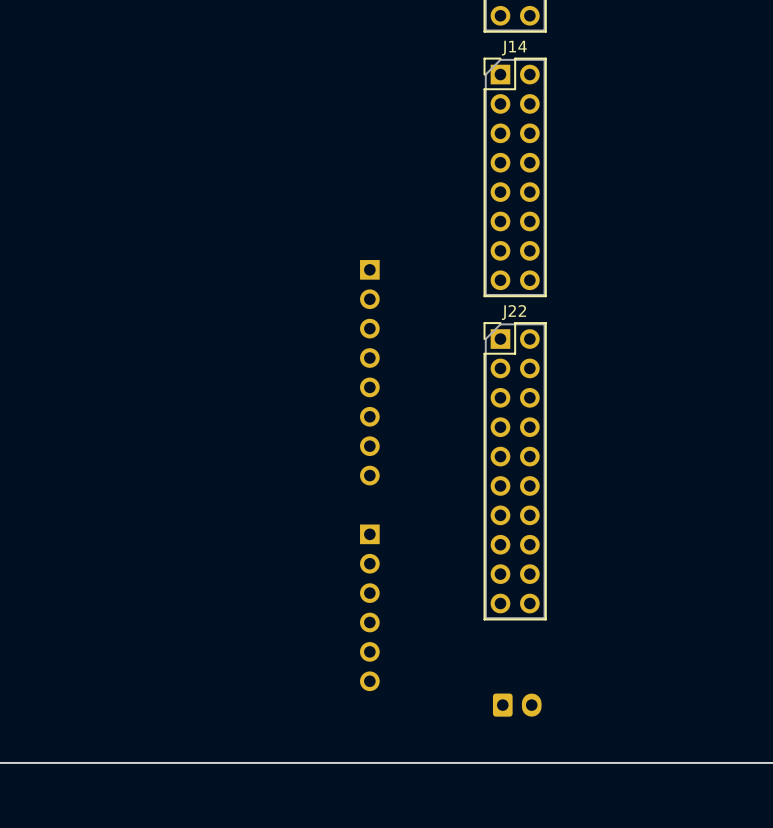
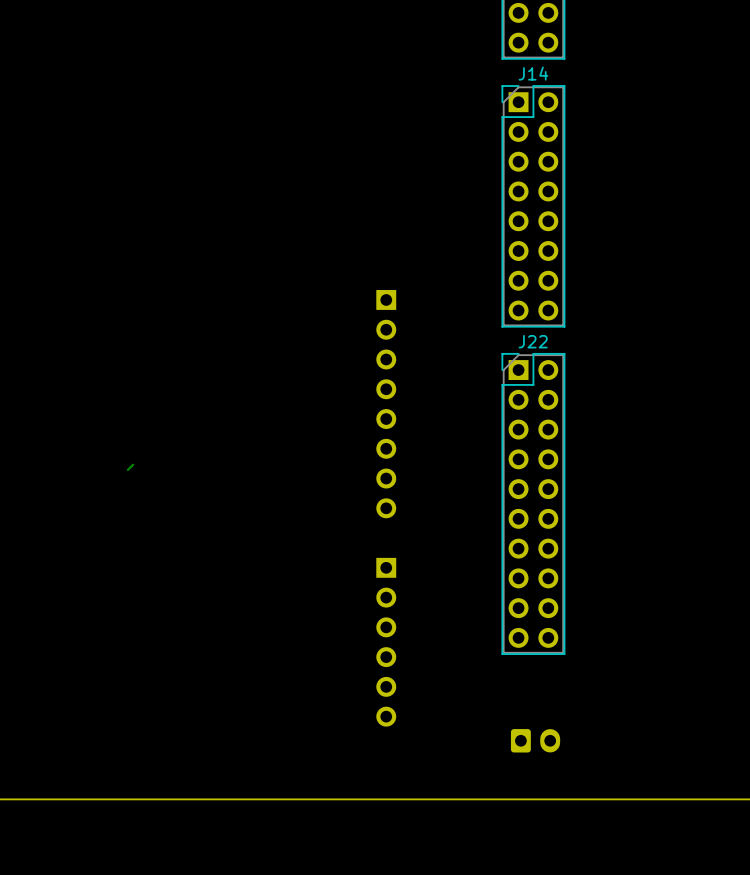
bottom track: none -> (133, 464) (128, 469)

